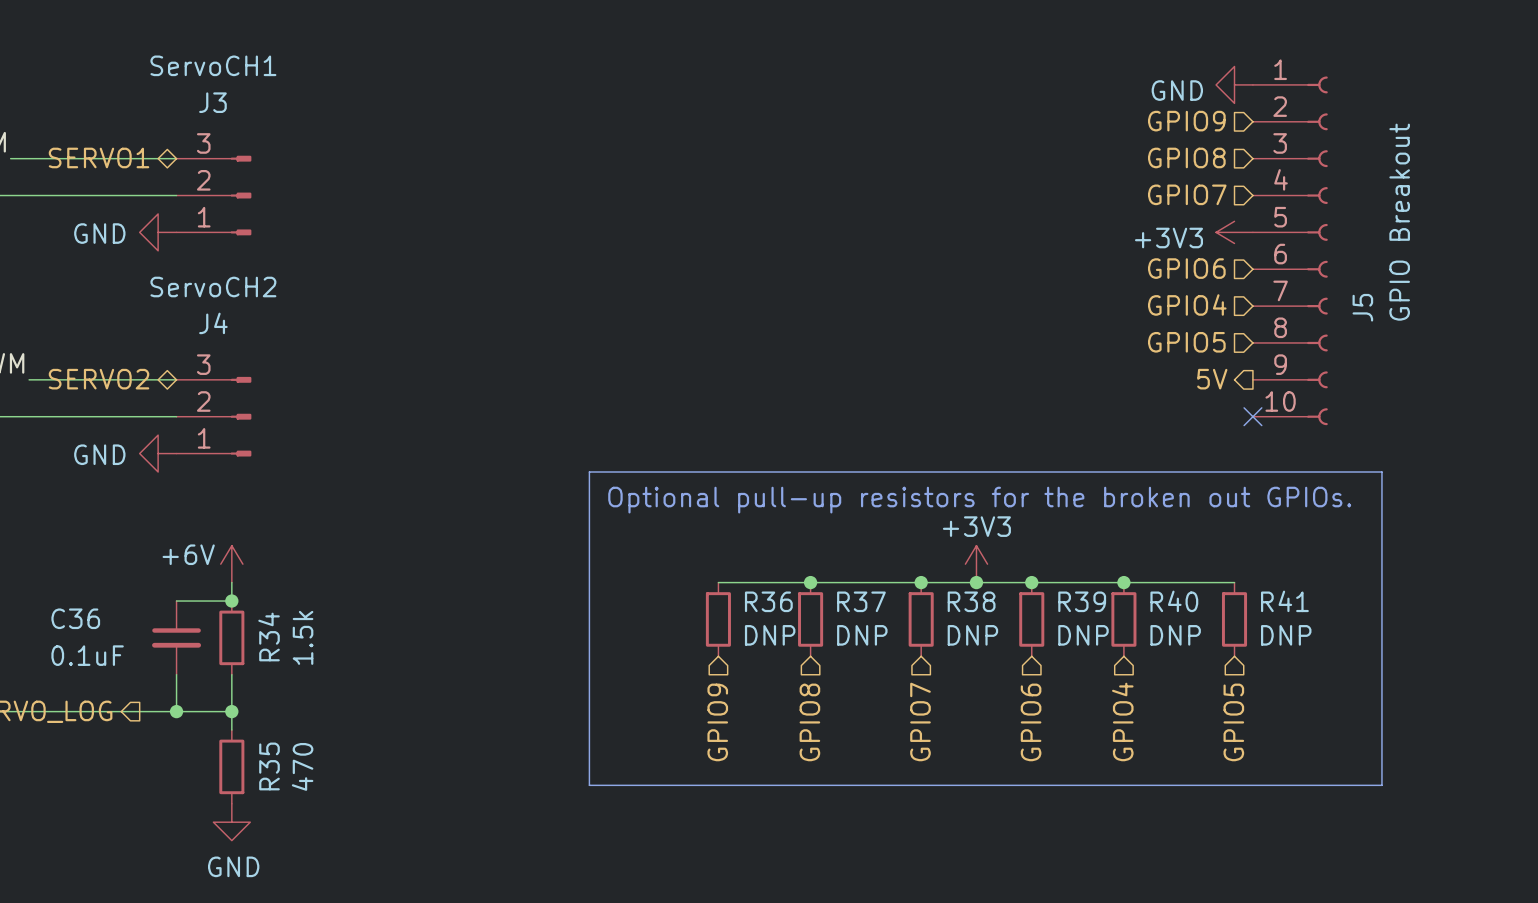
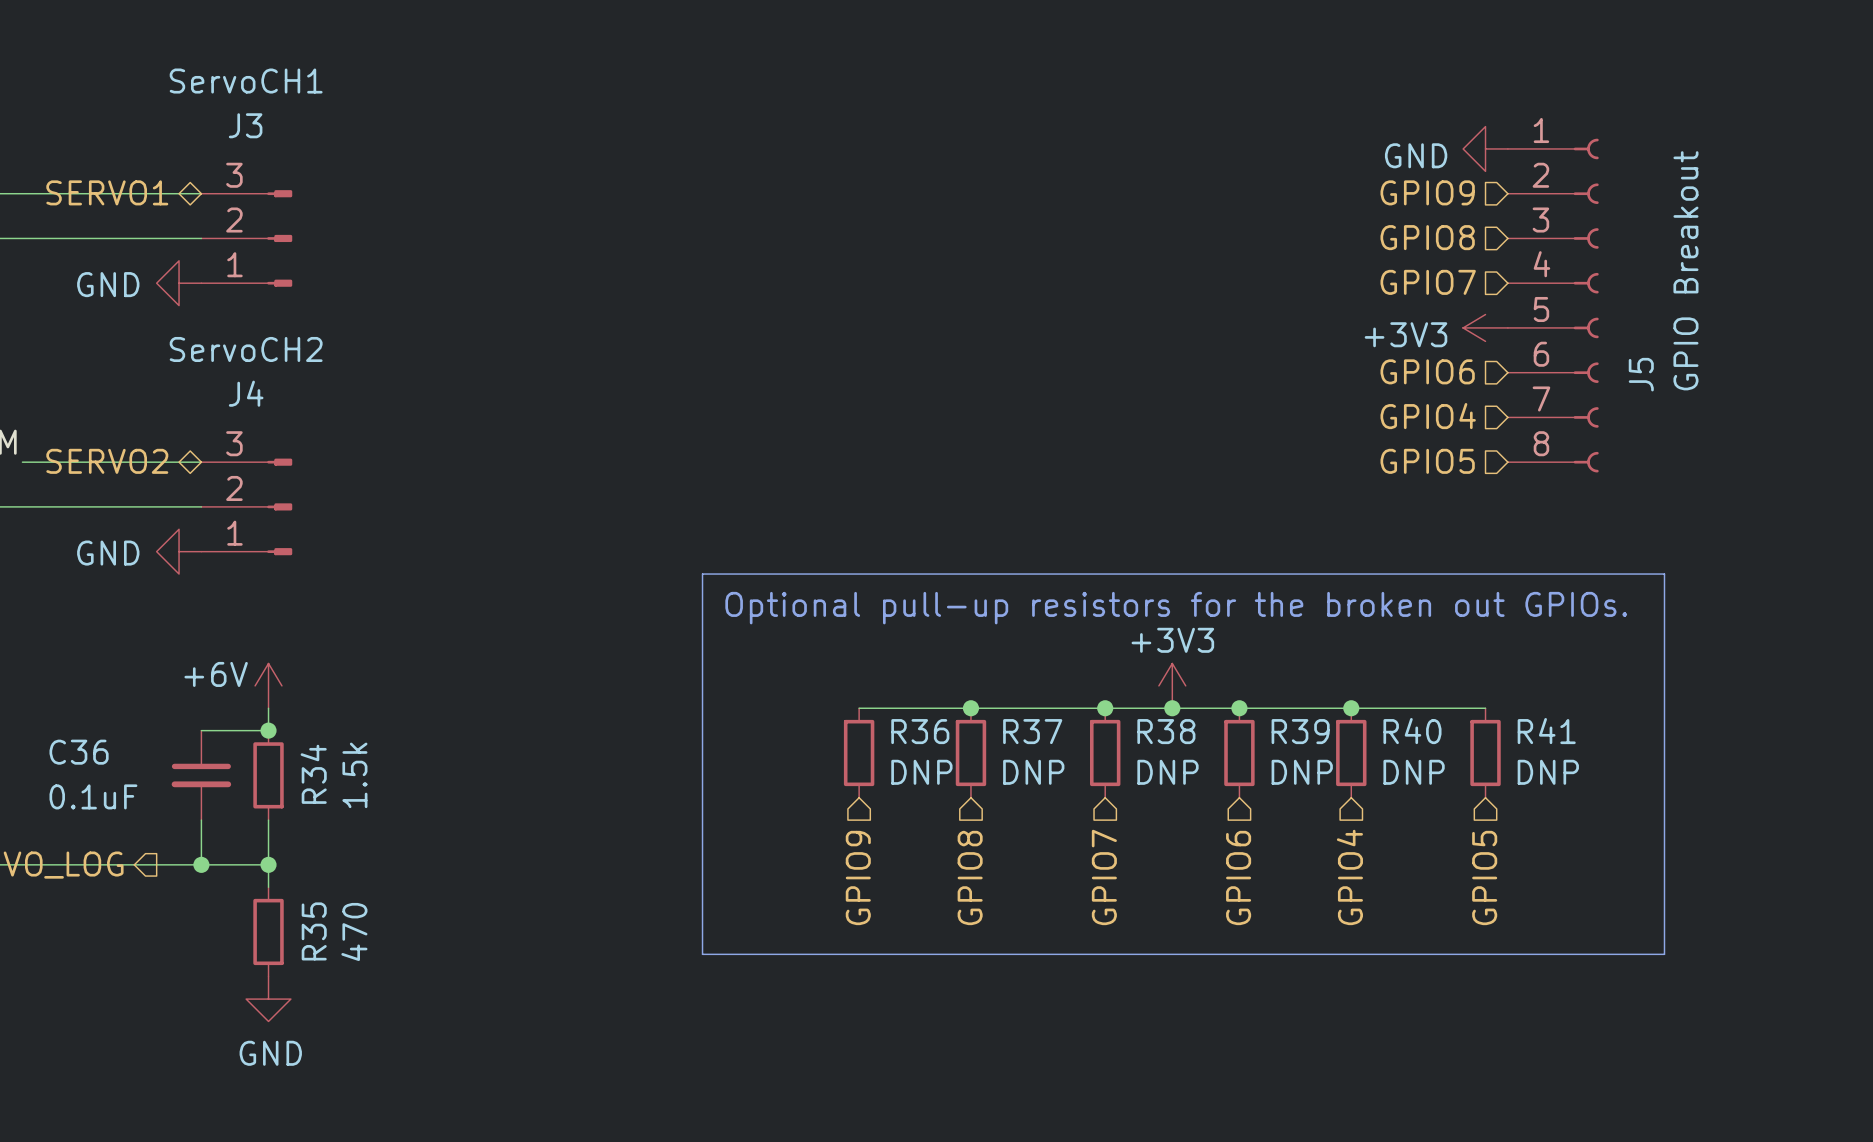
J5 symbol: [1252, 76, 1328, 426] -> [1507, 138, 1599, 473]
power symbol position: GND (1234, 84) -> GND (1485, 148)
hierarchical label: GPIO9 (1186, 121) -> none
hierarchical label: GPIO8 (1186, 157) -> GPIO9 (1427, 192)
hierarchical label: GPIO7 (1187, 194) -> GPIO8 (1427, 237)
power symbol position: +3V3 (1234, 232) -> +3V3 (1485, 327)
hierarchical label: GPIO6 (1186, 268) -> GPIO7 (1428, 282)
hierarchical label: GPIO4 (1187, 304) -> GPIO6 (1427, 371)
hierarchical label: GPIO5 (1186, 342) -> GPIO4 (1428, 416)
hierarchical label shape: output (1212, 379) -> input (1427, 461)
hierarchical label: 5V (1212, 379) -> GPIO5 (1427, 461)
no-connect mark: (1252, 416) -> none

